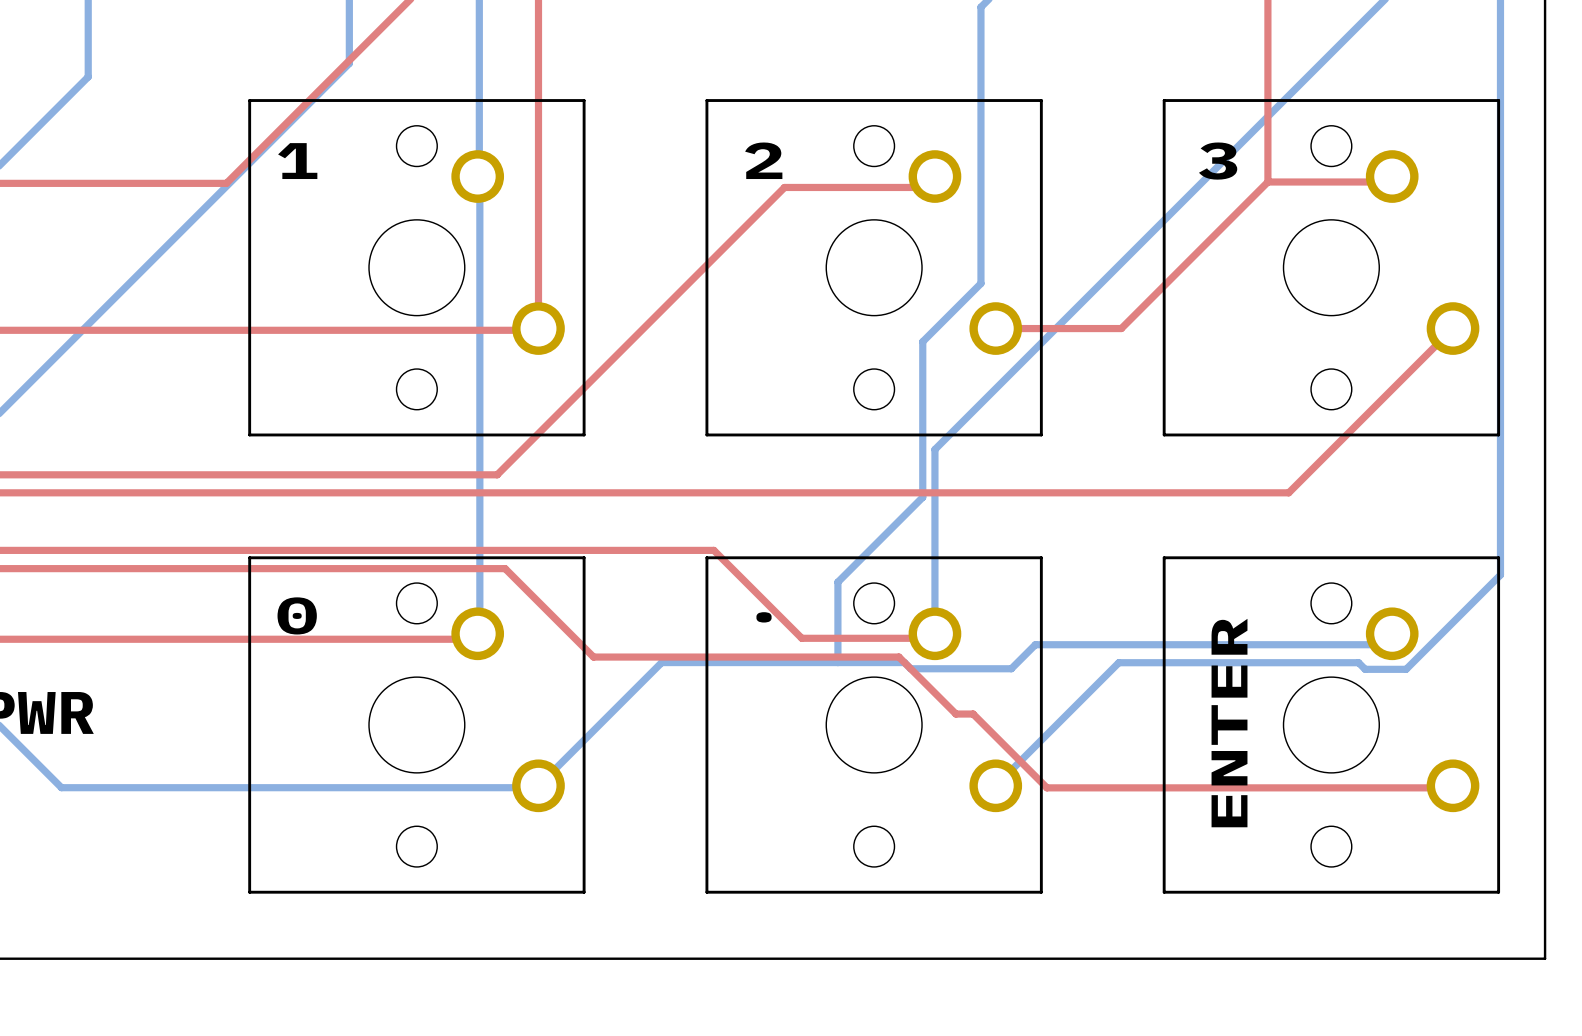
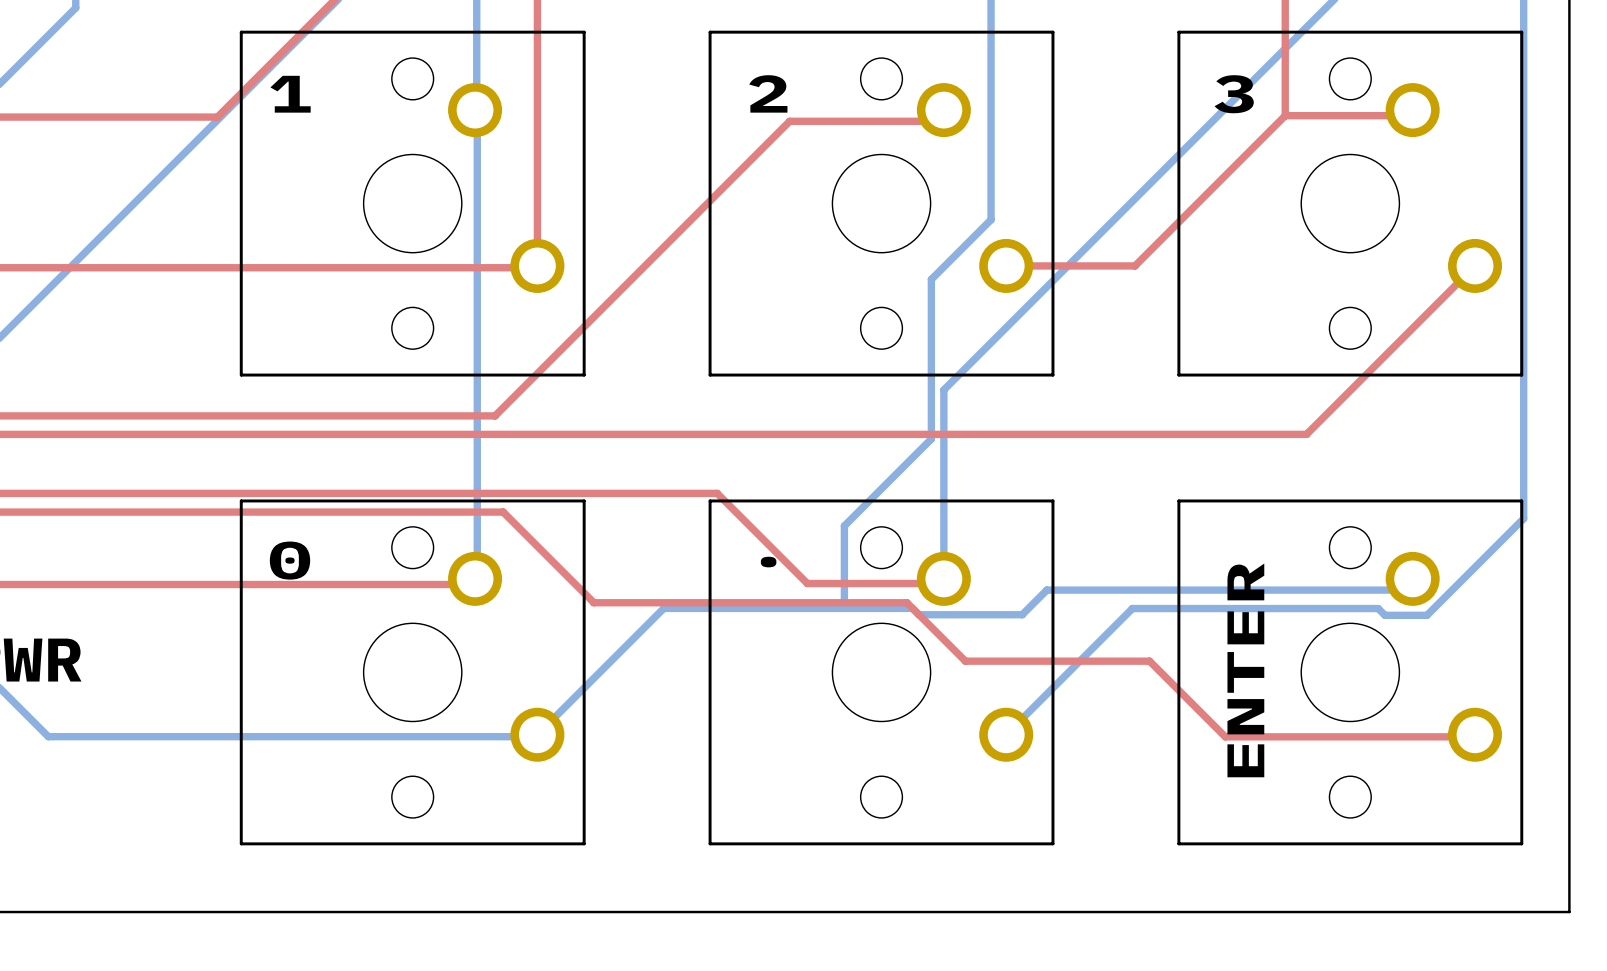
top track: (973, 714) (1046, 787) (1209, 787) -> (983, 661) (1149, 661) (1225, 736)

